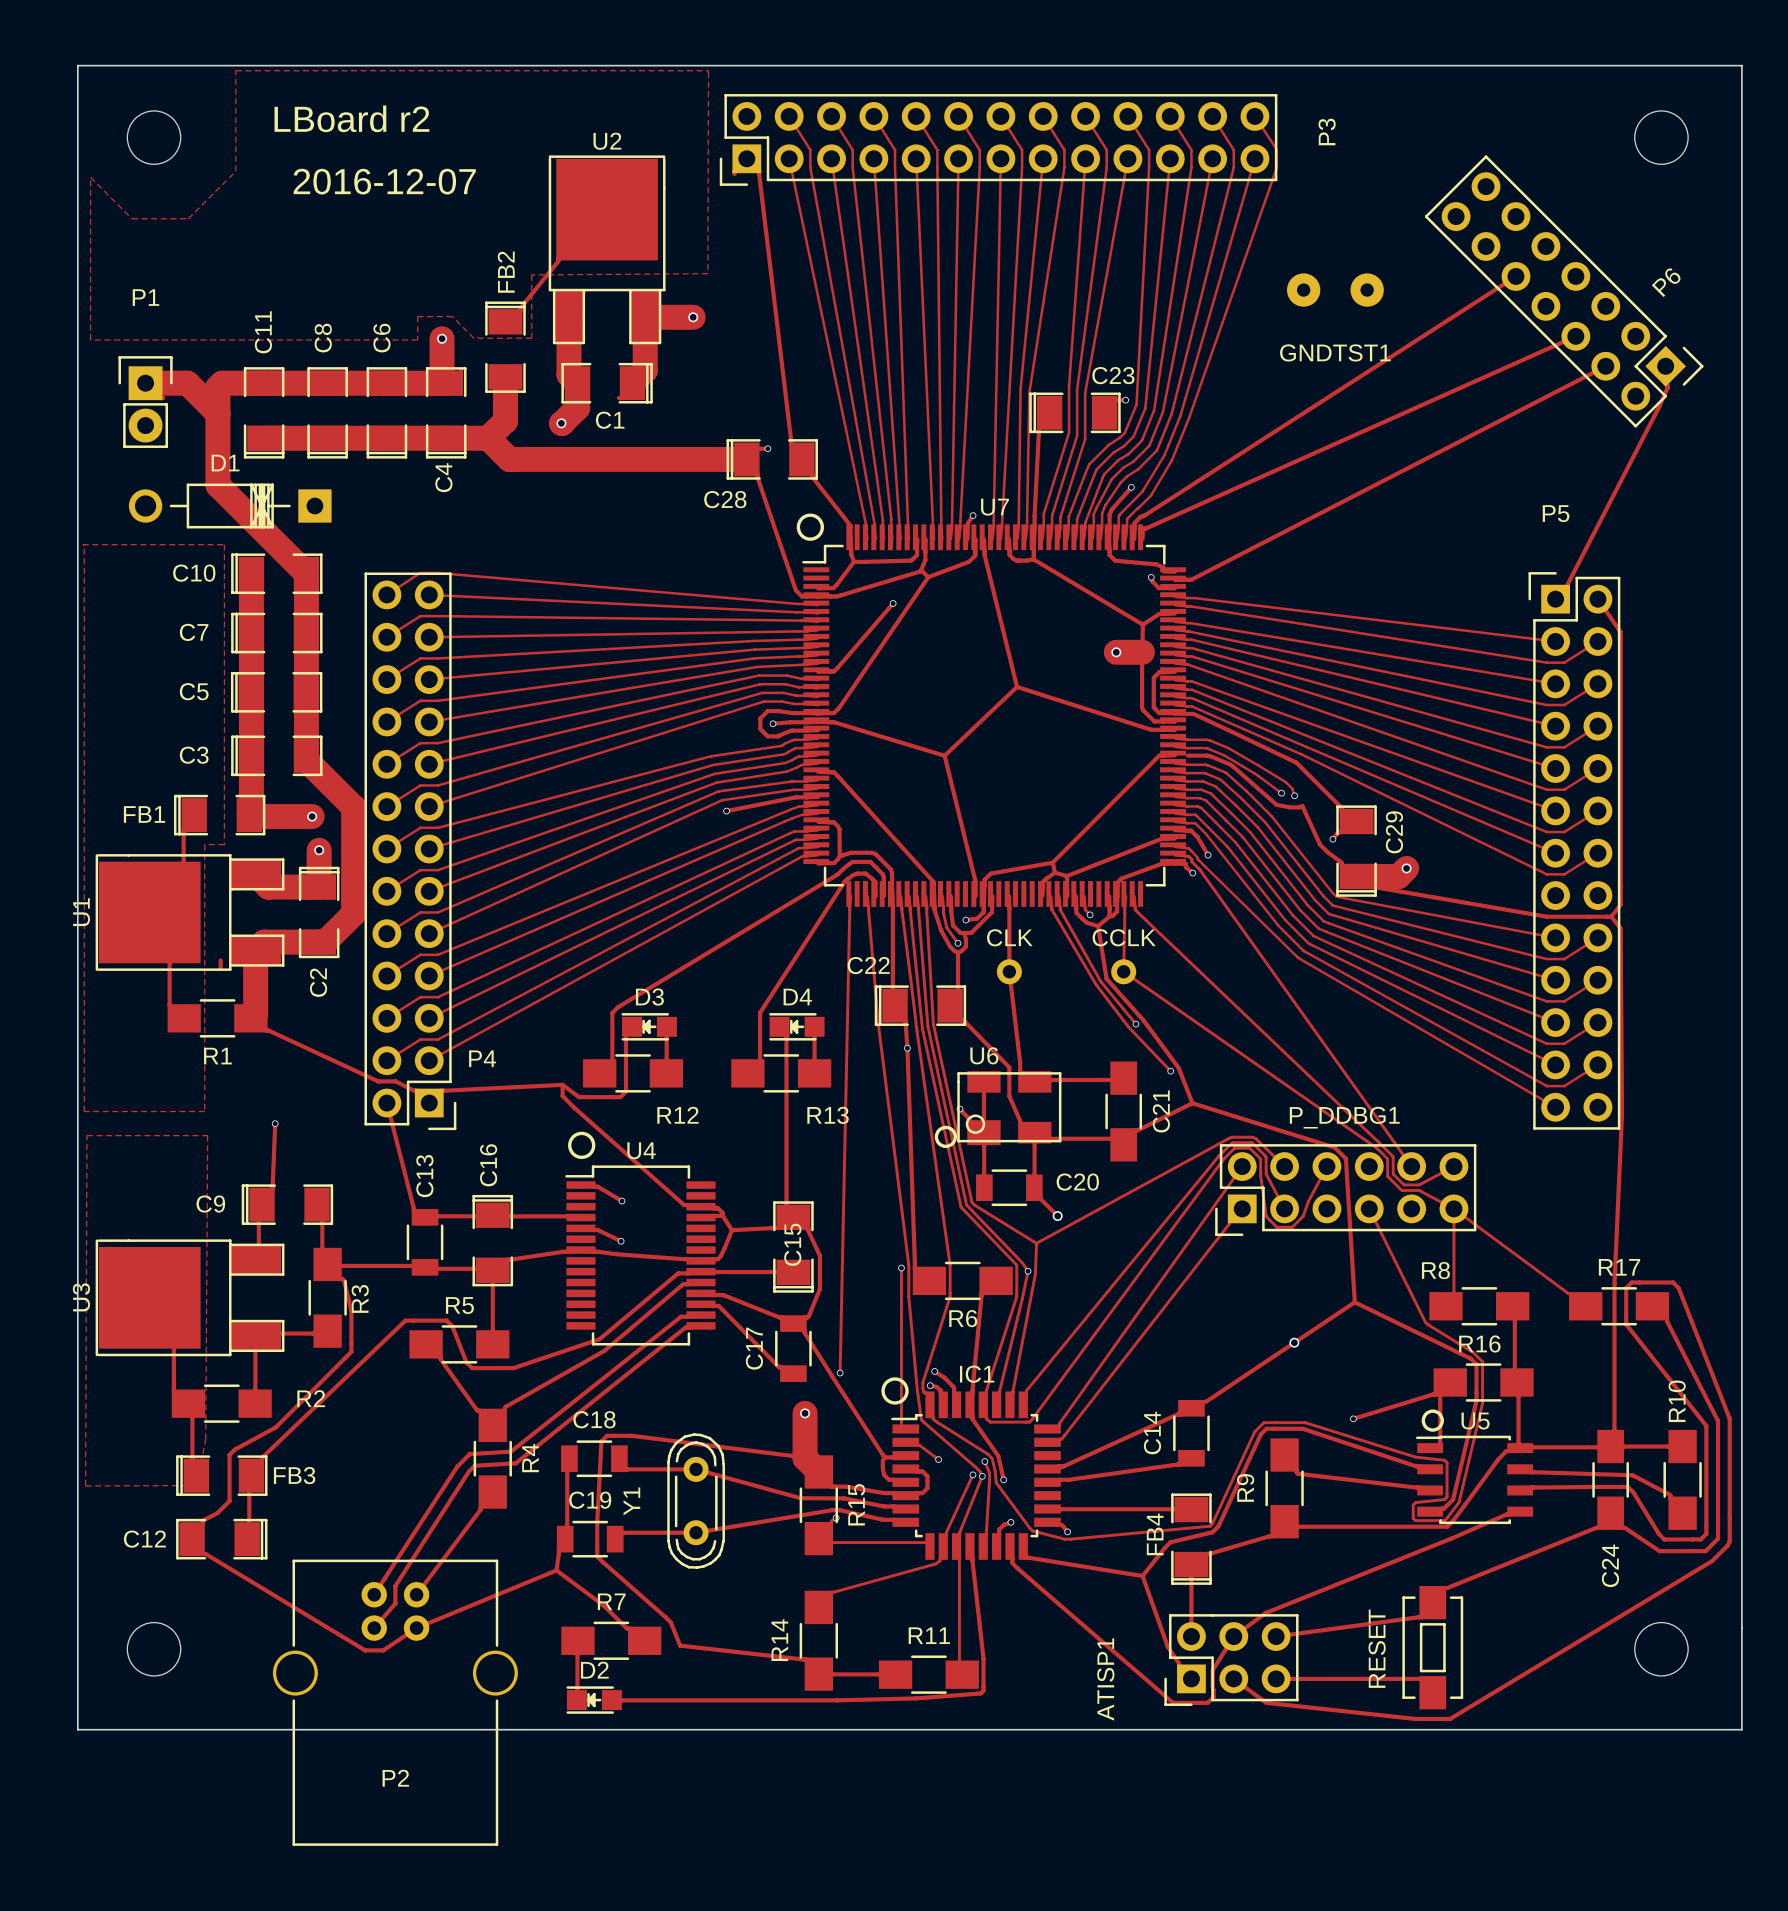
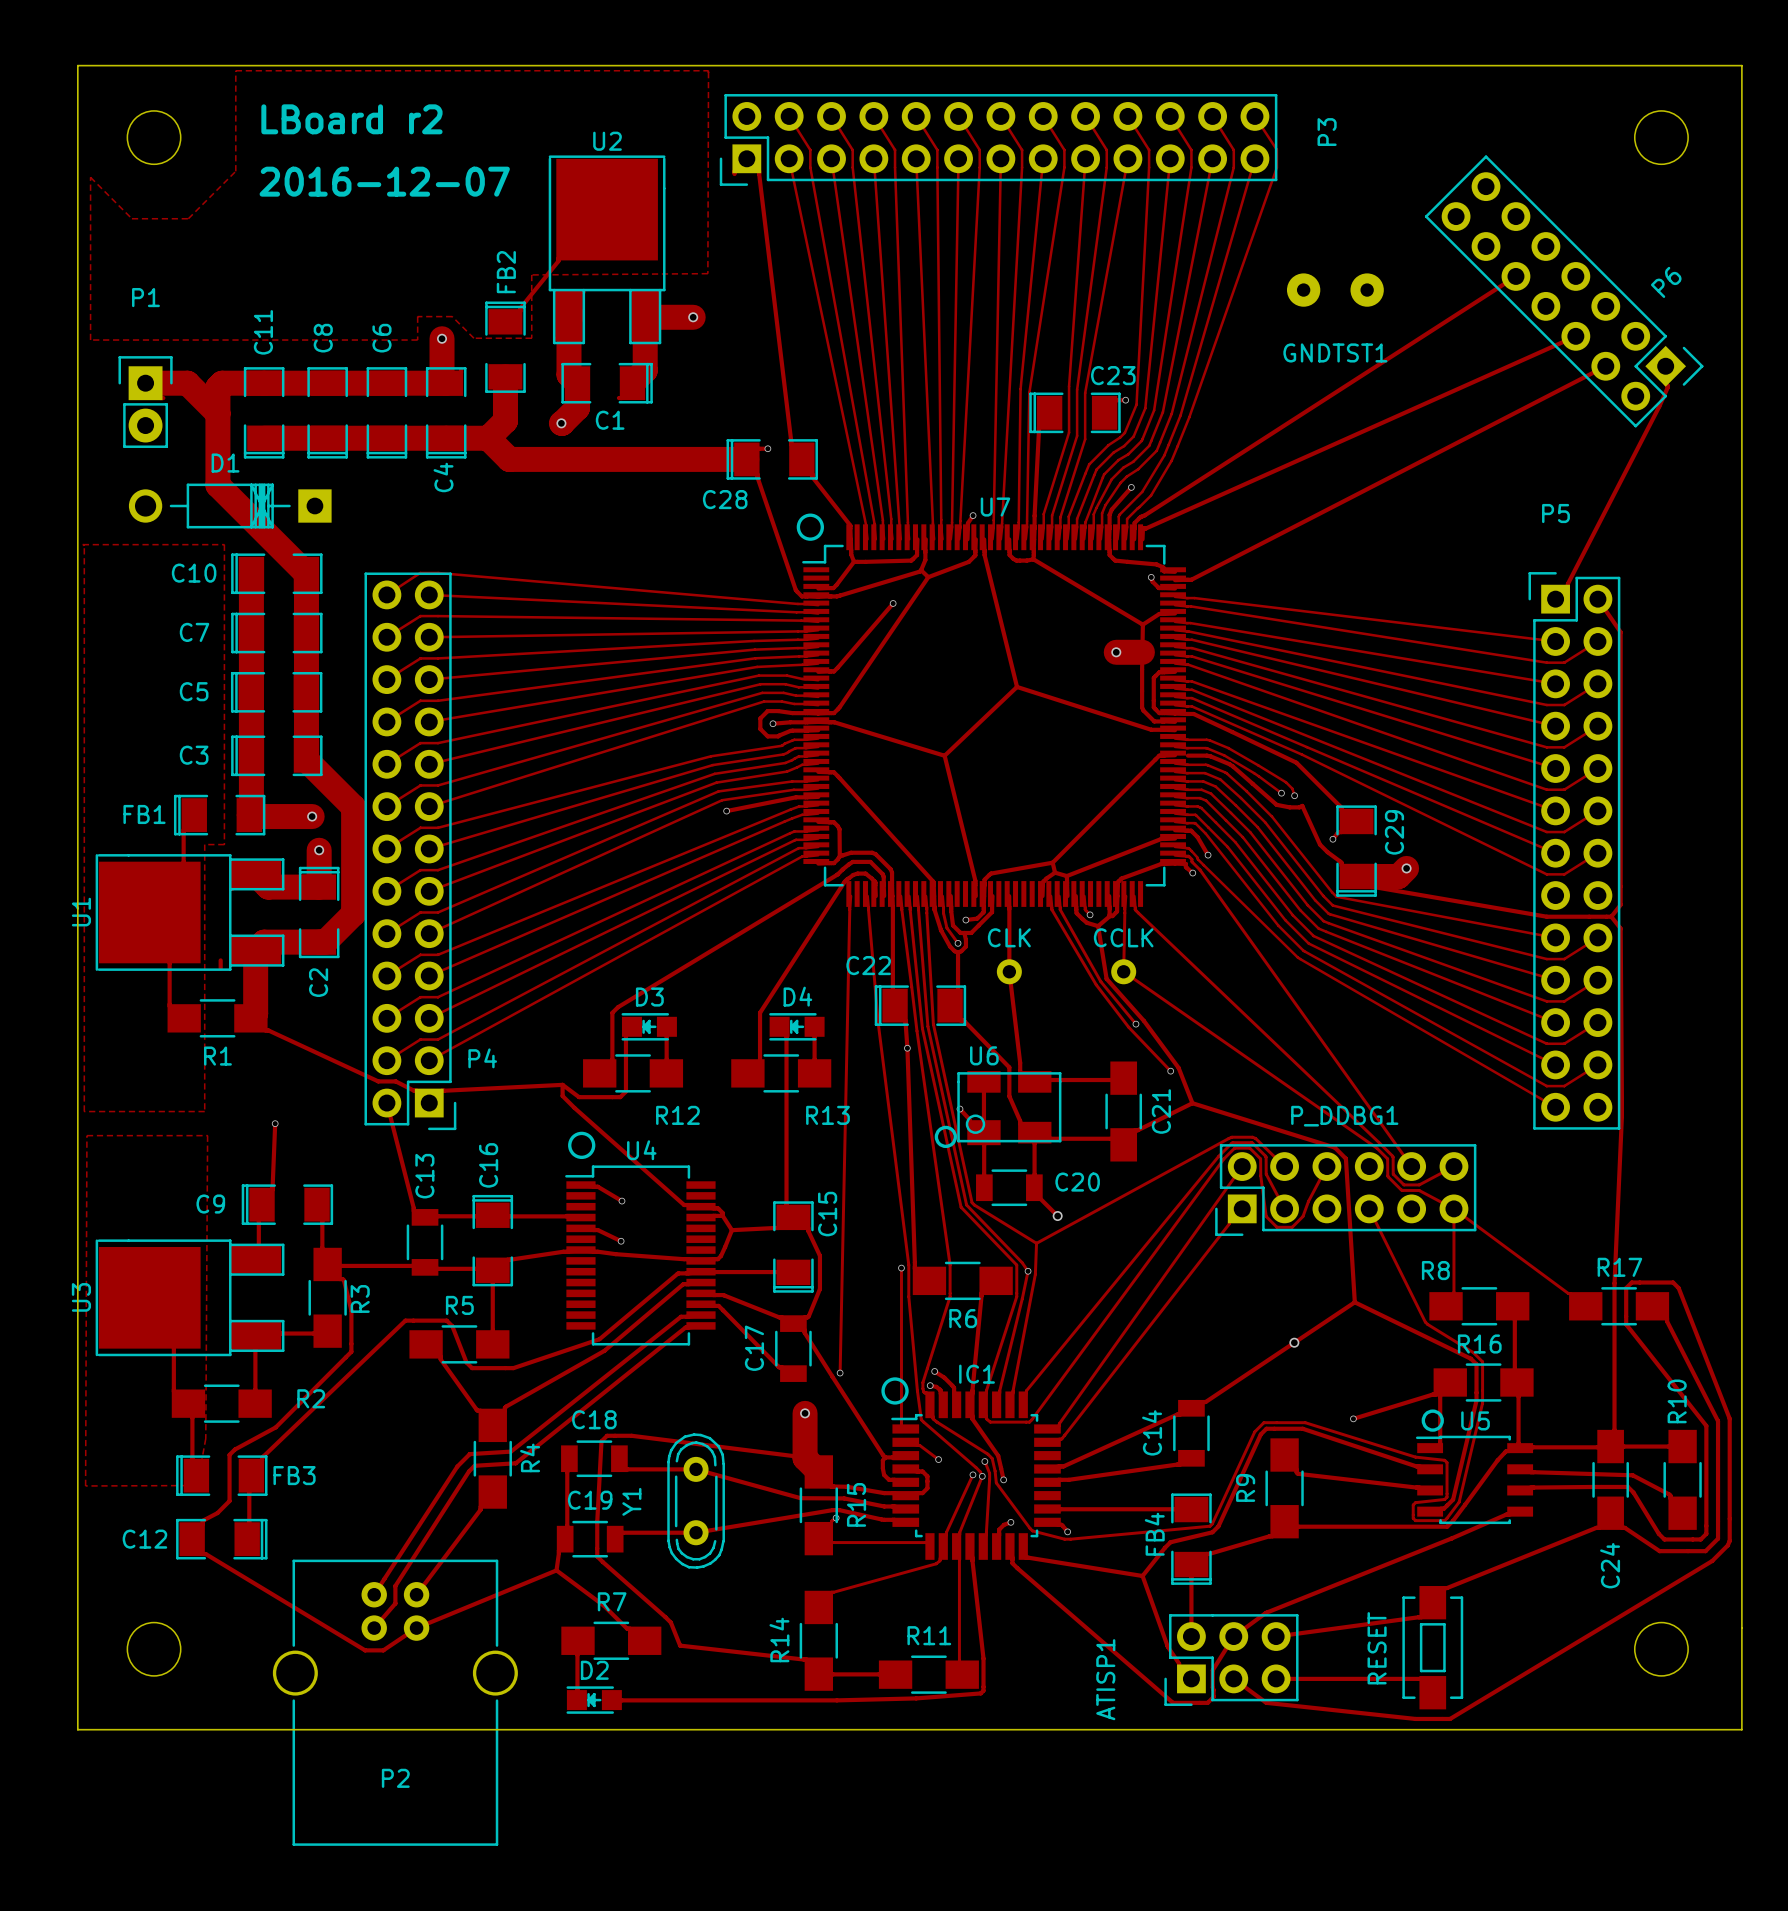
C15 name position: C15 (792, 1244) -> C15 (827, 1214)

